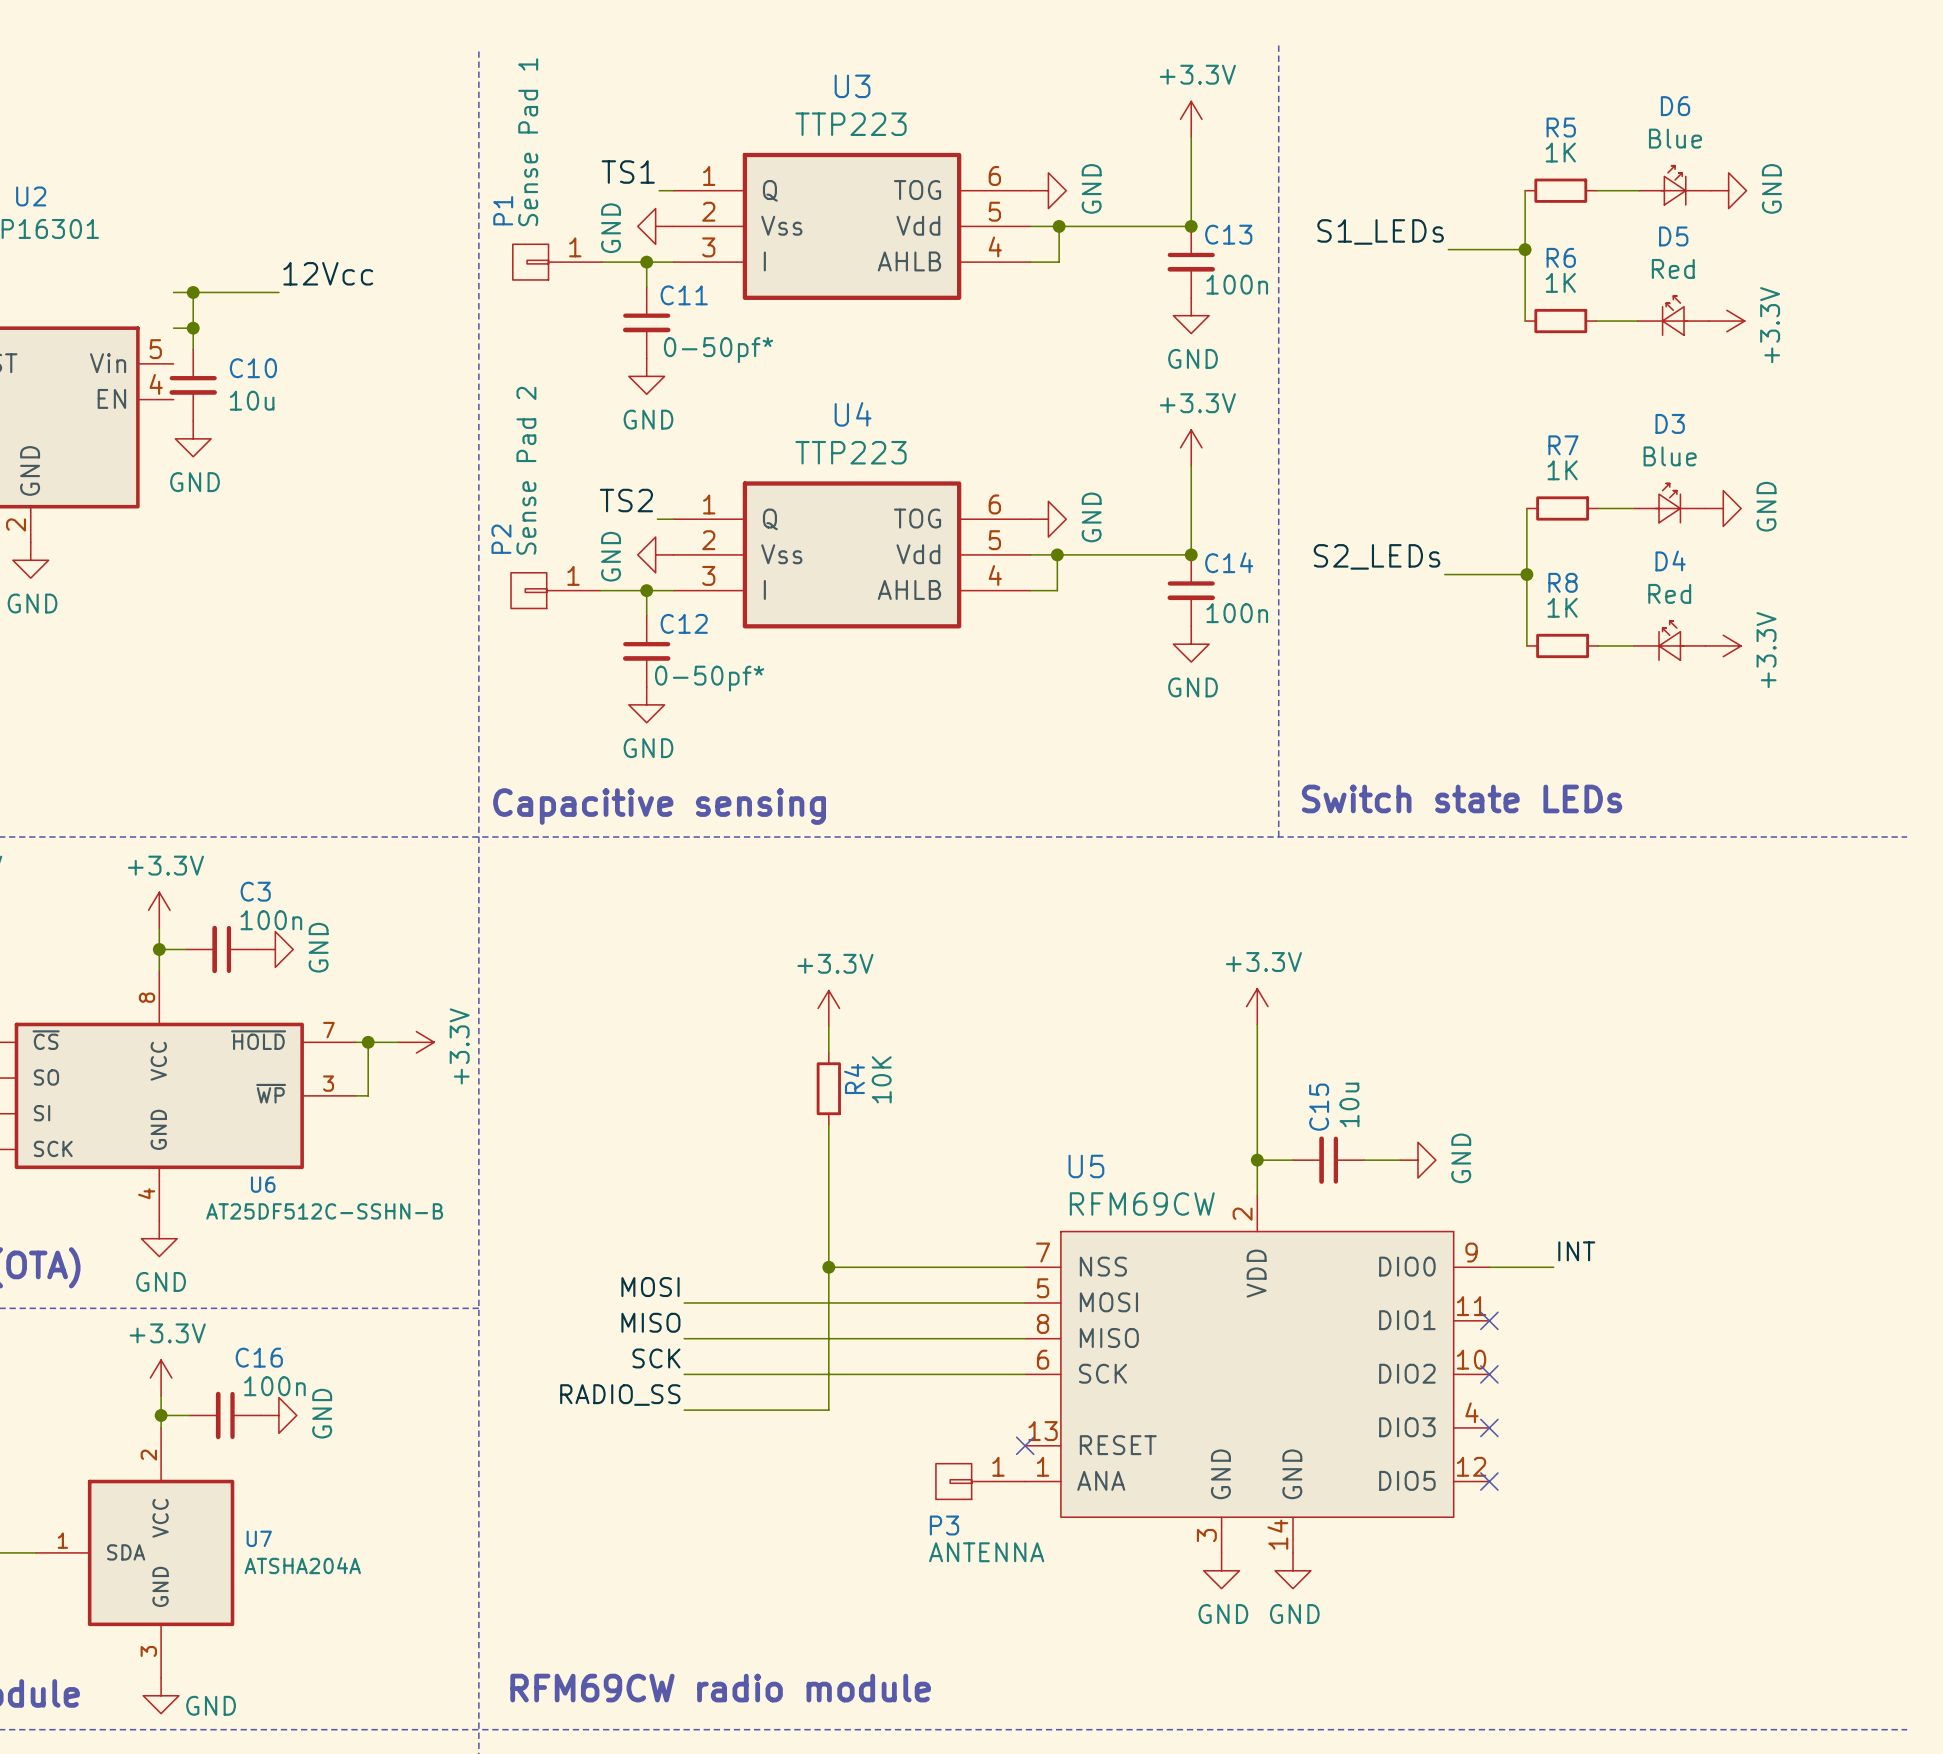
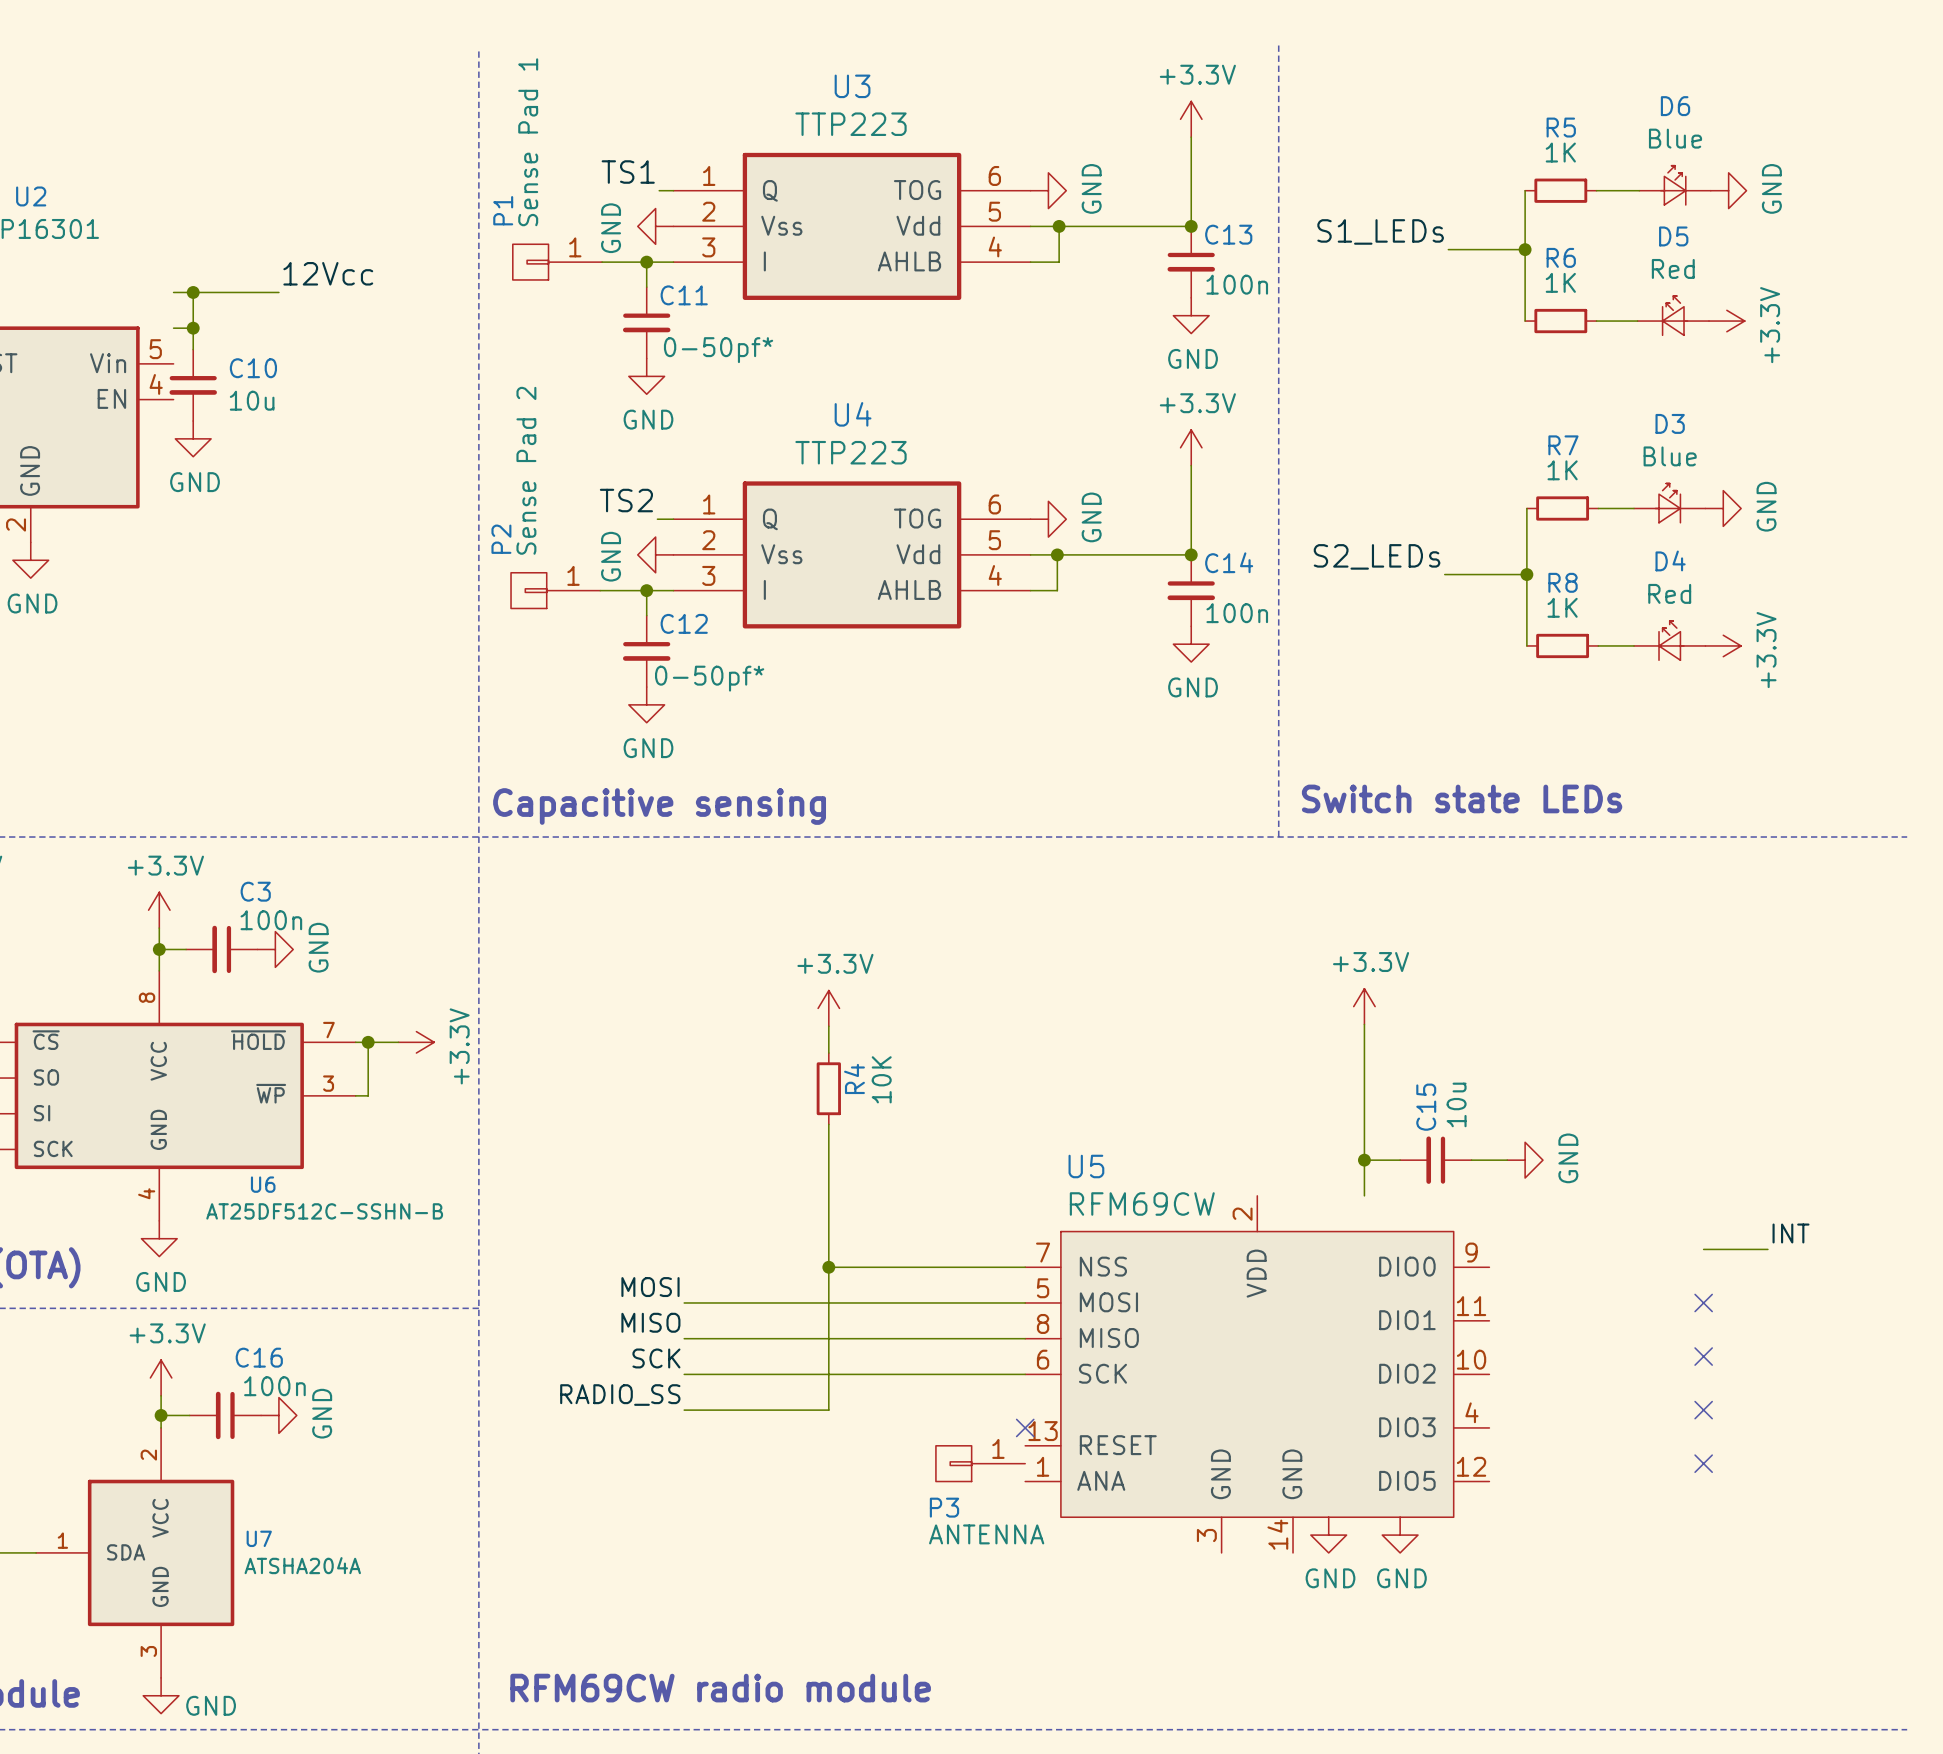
power symbol position: +3.3V (1257, 1006) -> +3.3V (1364, 1006)
wire: (1257, 1024) (1257, 1195) -> (1364, 1024) (1364, 1195)
wire: (1257, 1160) (1293, 1160) -> (1471, 1160) (1507, 1160)
junction: (1257, 1160) -> none
C15 position: (1328, 1160) -> (1435, 1160)
junction: none -> (1364, 1160)
power symbol position: GND (1417, 1160) -> GND (1525, 1160)
label position: INT (1576, 1251) -> INT (1791, 1233)
wire: (1489, 1267) (1553, 1267) -> (1703, 1249) (1767, 1249)
no-connect mark: none -> (1703, 1302)
no-connect mark: (1489, 1320) -> none
no-connect mark: none -> (1703, 1356)
no-connect mark: (1489, 1374) -> none
no-connect mark: none -> (1703, 1410)
no-connect mark: (1489, 1427) -> none
no-connect mark position: (1025, 1445) -> (1025, 1427)
no-connect mark: none -> (1703, 1463)
P3 position: (980, 1481) -> (980, 1463)
no-connect mark: (1489, 1481) -> none
power symbol: none -> GND (1400, 1535)
power symbol: GND (1221, 1570) -> none
power symbol position: GND (1293, 1570) -> GND (1328, 1535)

